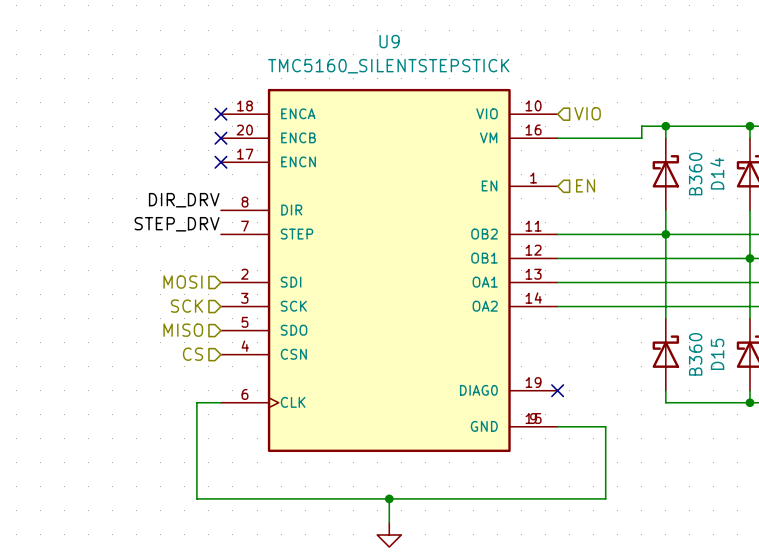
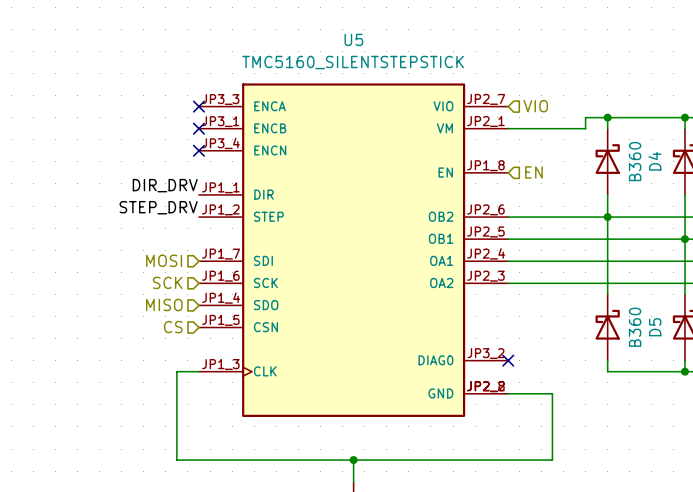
U9 name: U9 (389, 41) -> U5 (353, 39)
U9 symbol: [220, 88, 558, 453] -> [198, 83, 509, 417]
D14 name: D14 (717, 173) -> D4 (654, 161)
D15 name: D15 (717, 354) -> D5 (655, 327)

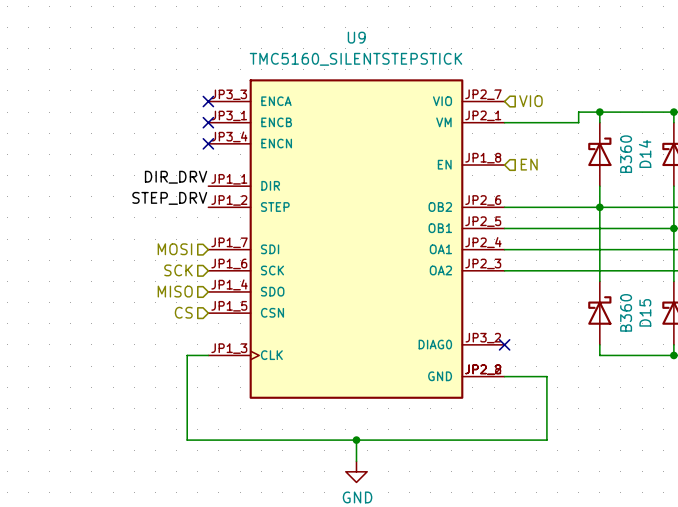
U5 name: U5 (353, 39) -> U9 (356, 37)
D4 name: D4 (654, 161) -> D14 (645, 153)
D5 name: D5 (655, 327) -> D15 (645, 312)

